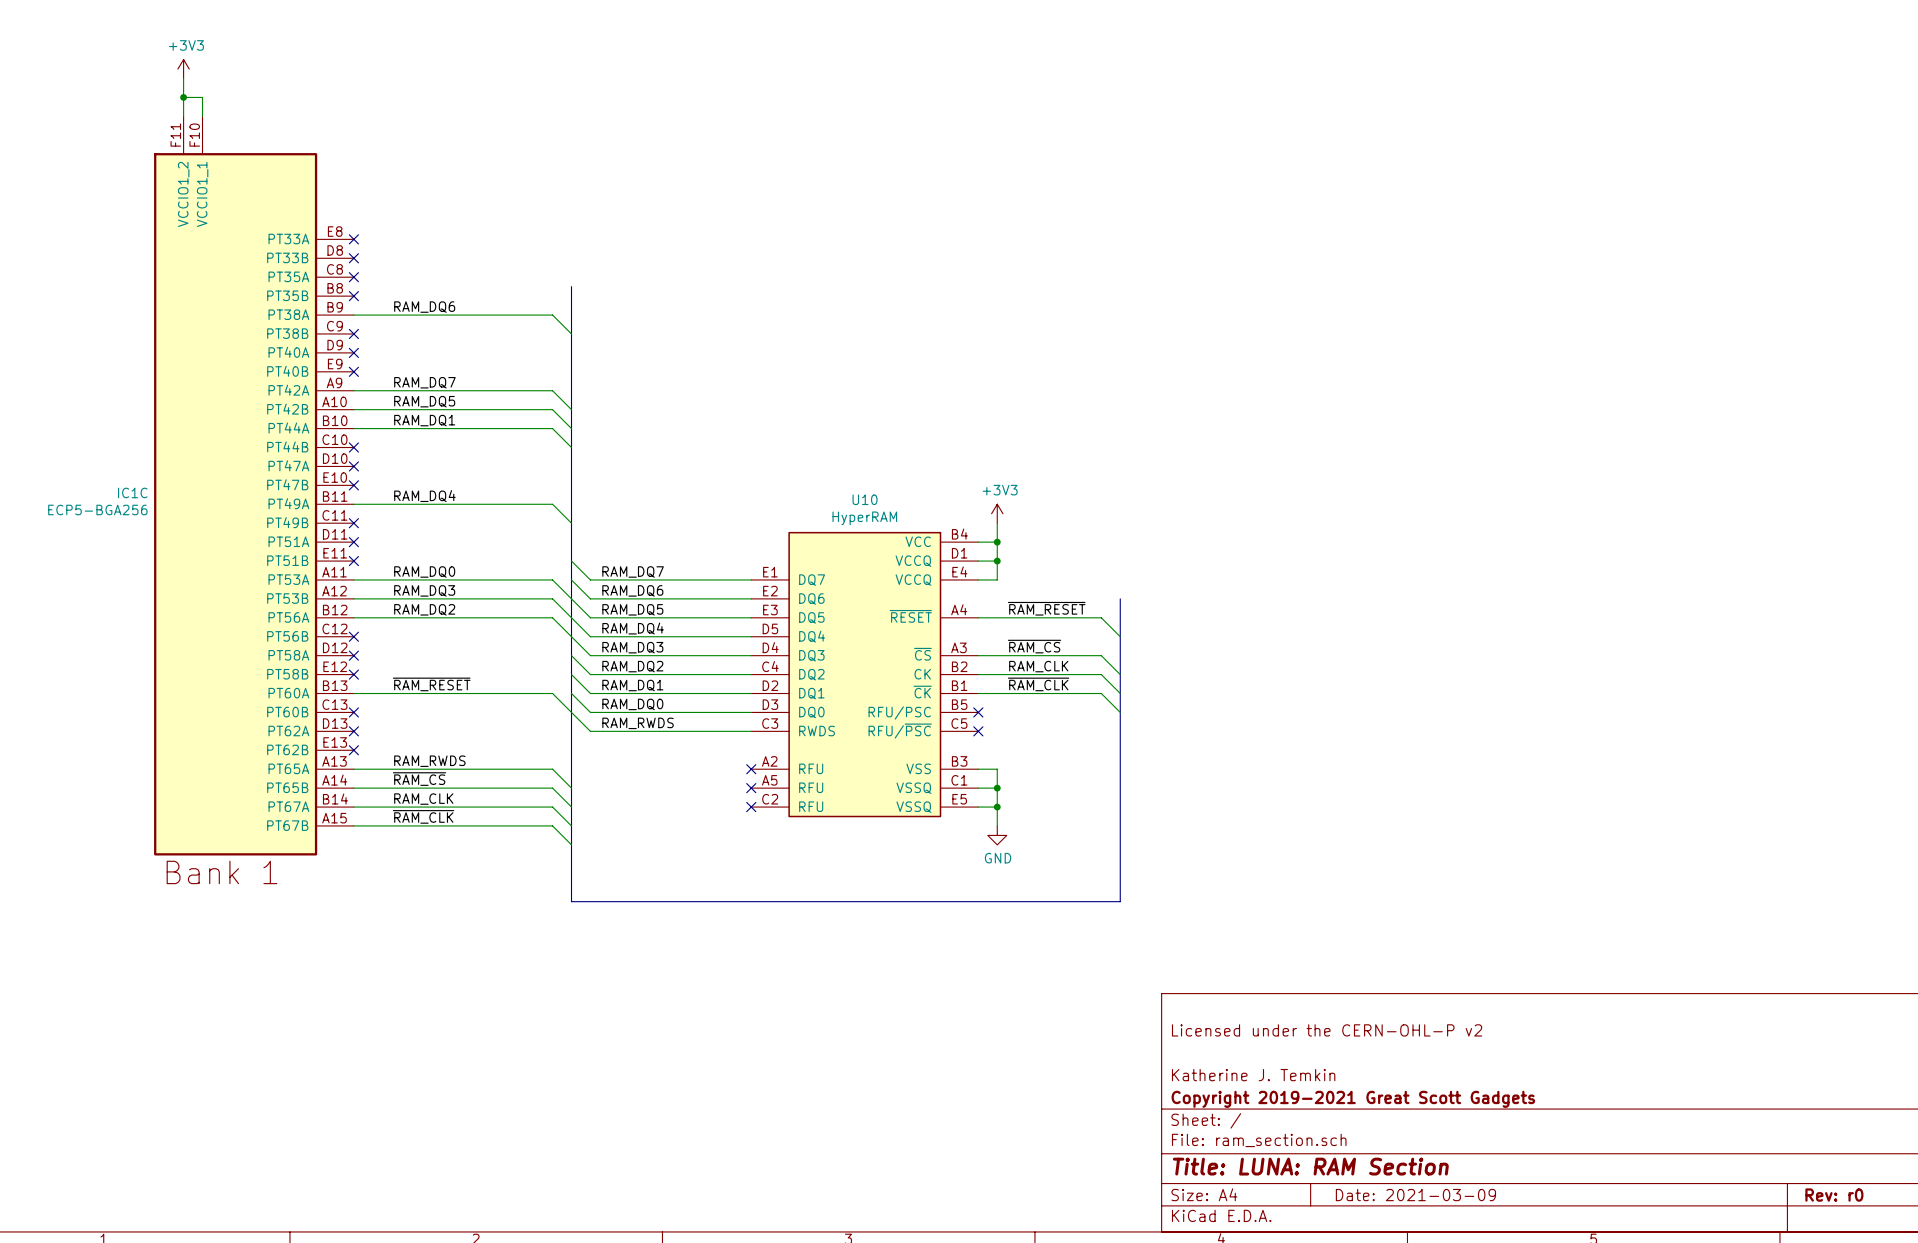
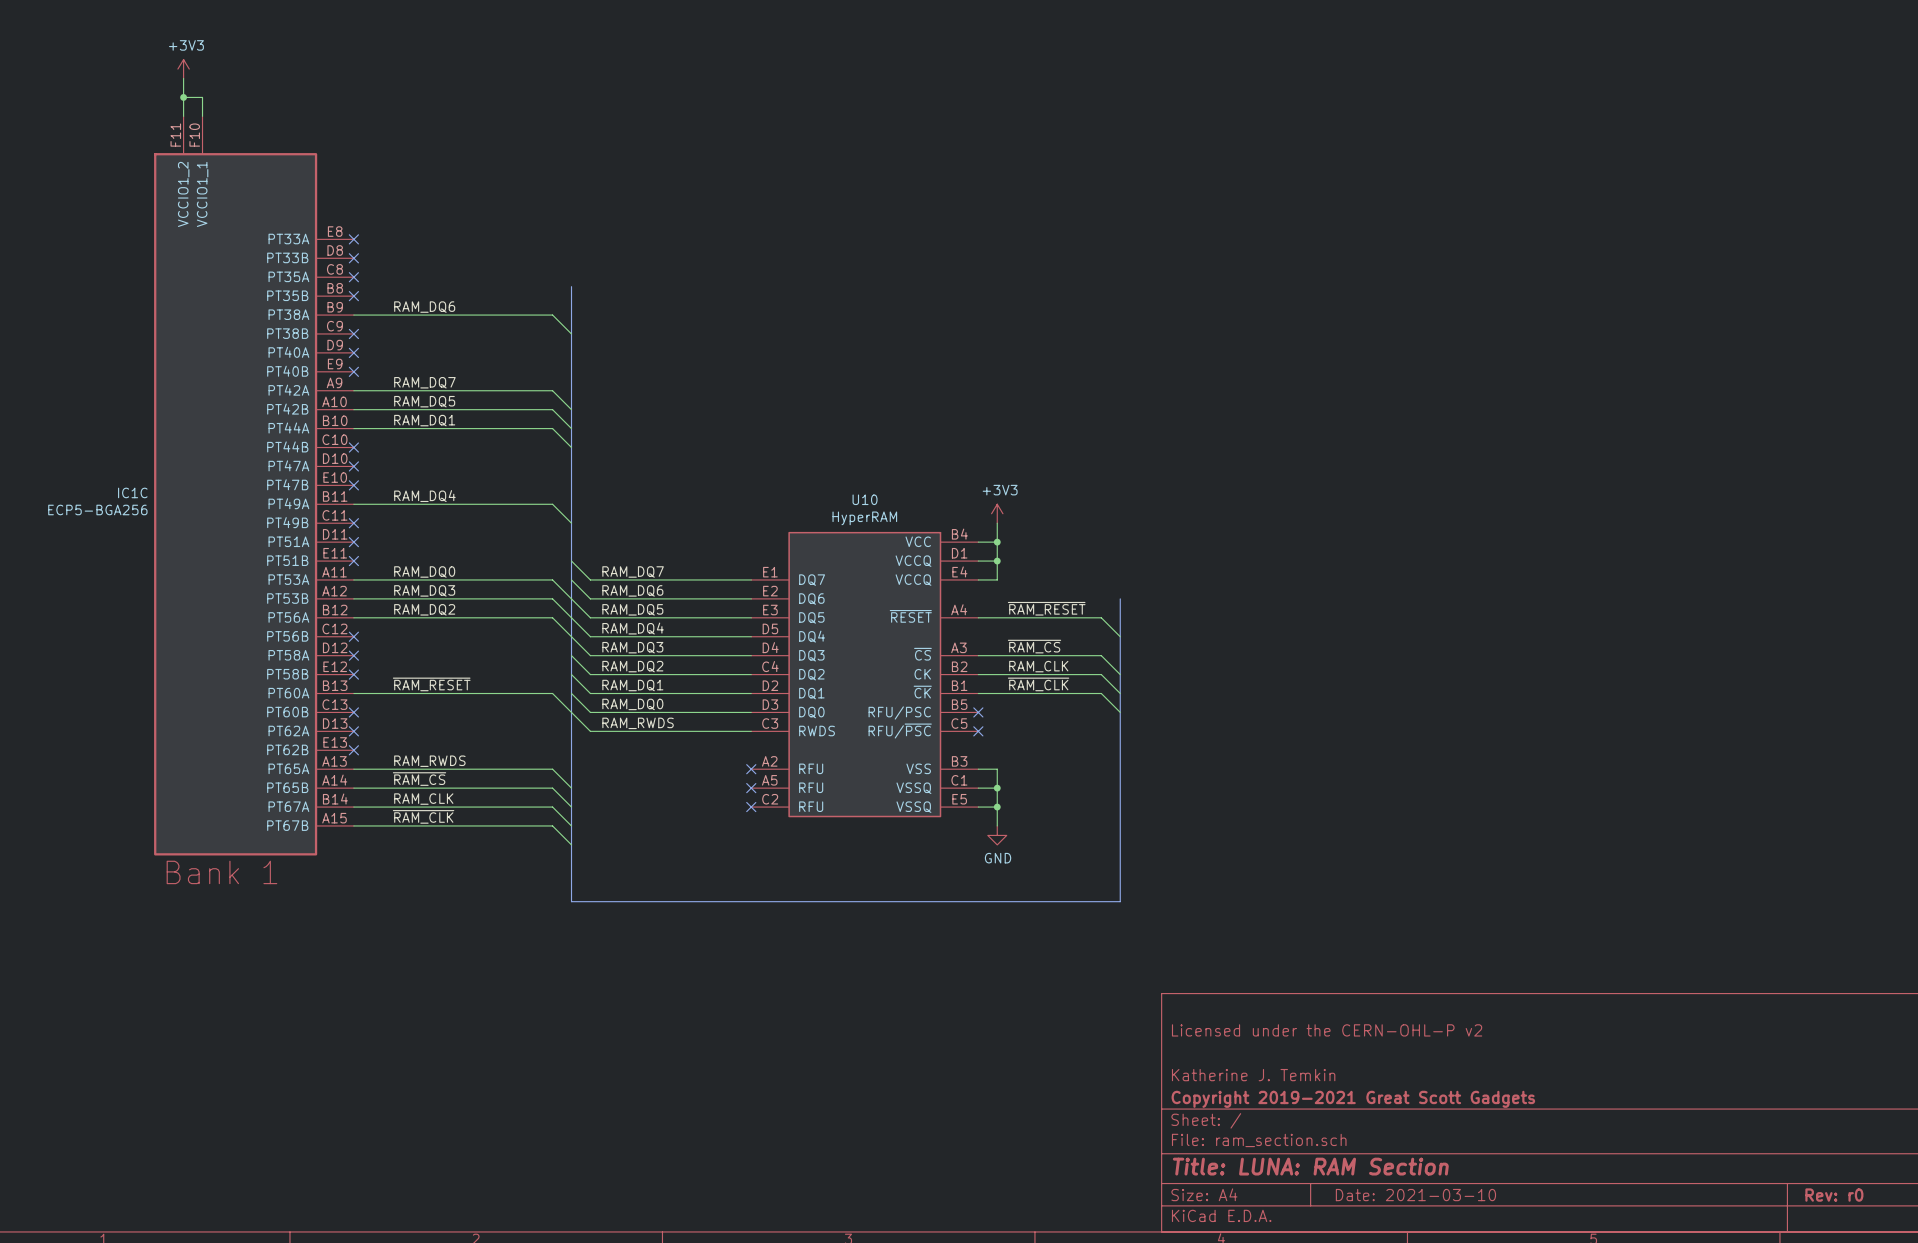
title block: Date: 2021-03-09 (1415, 1195) -> Date: 2021-03-10 (1415, 1195)

